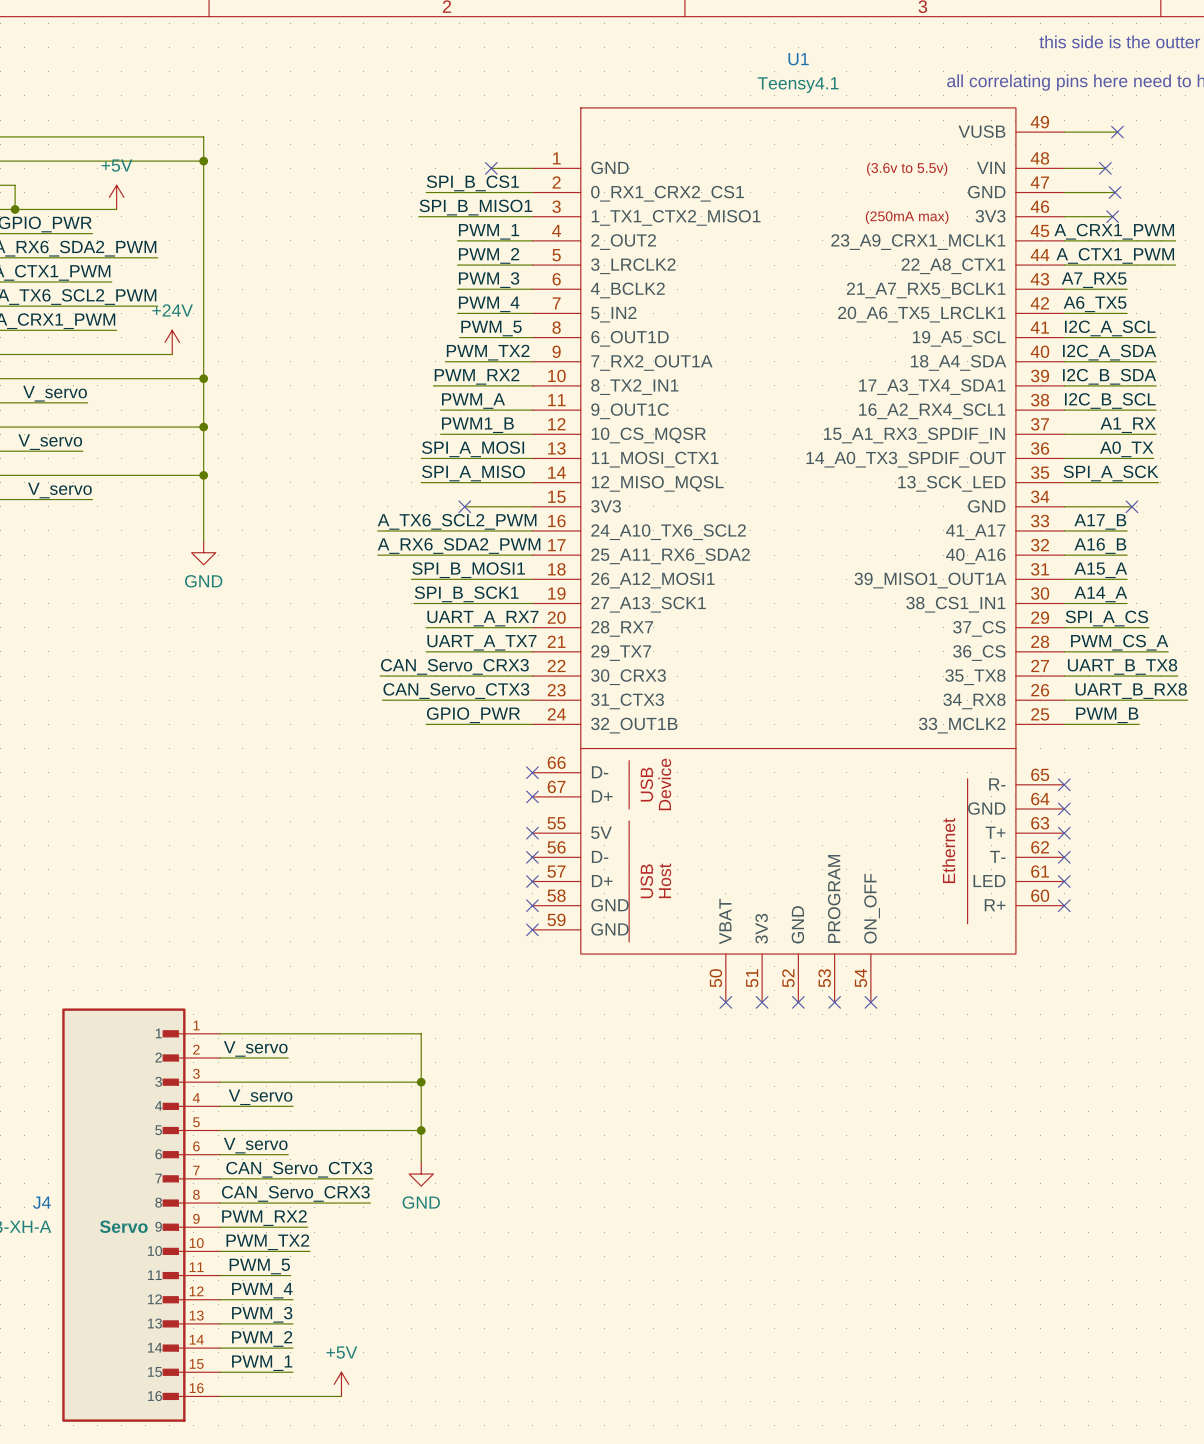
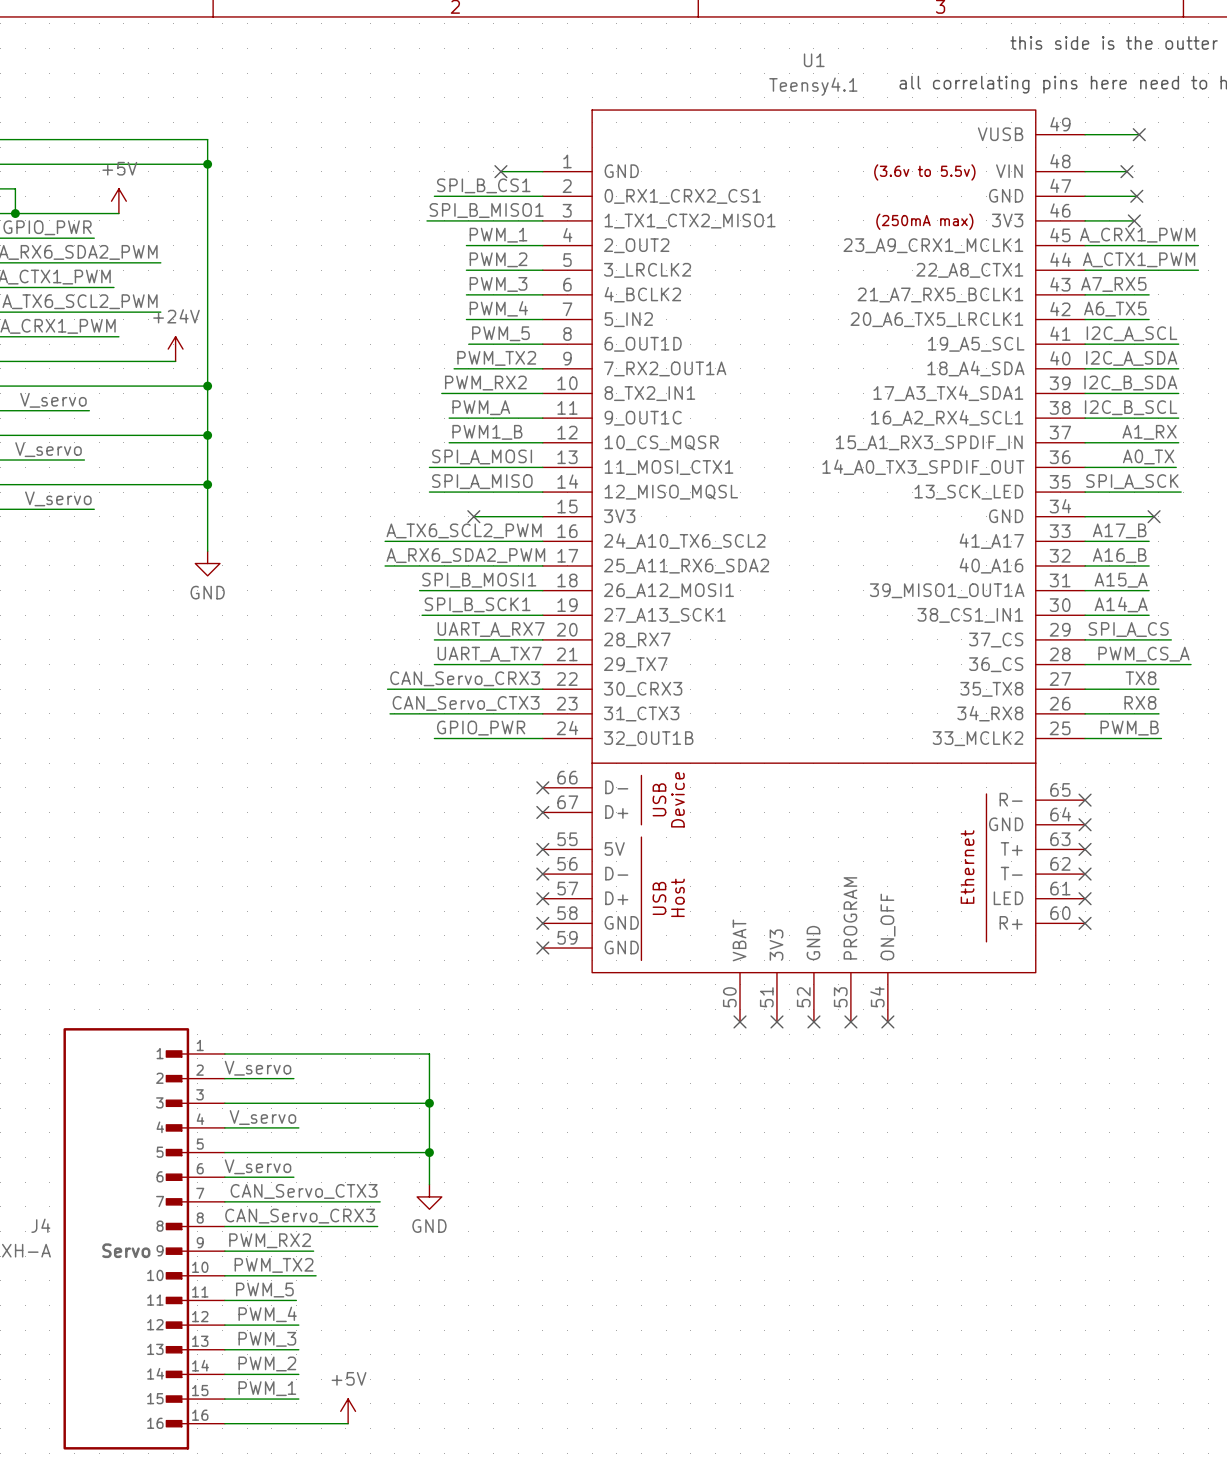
label: none -> TX8 (1141, 678)
label: UART_B_TX8 (1122, 666) -> none
wire: (1136, 676) (1177, 676) -> none
label: none -> RX8 (1140, 702)
label: UART_B_RX8 (1131, 691) -> none
wire: (1136, 700) (1187, 700) -> none

